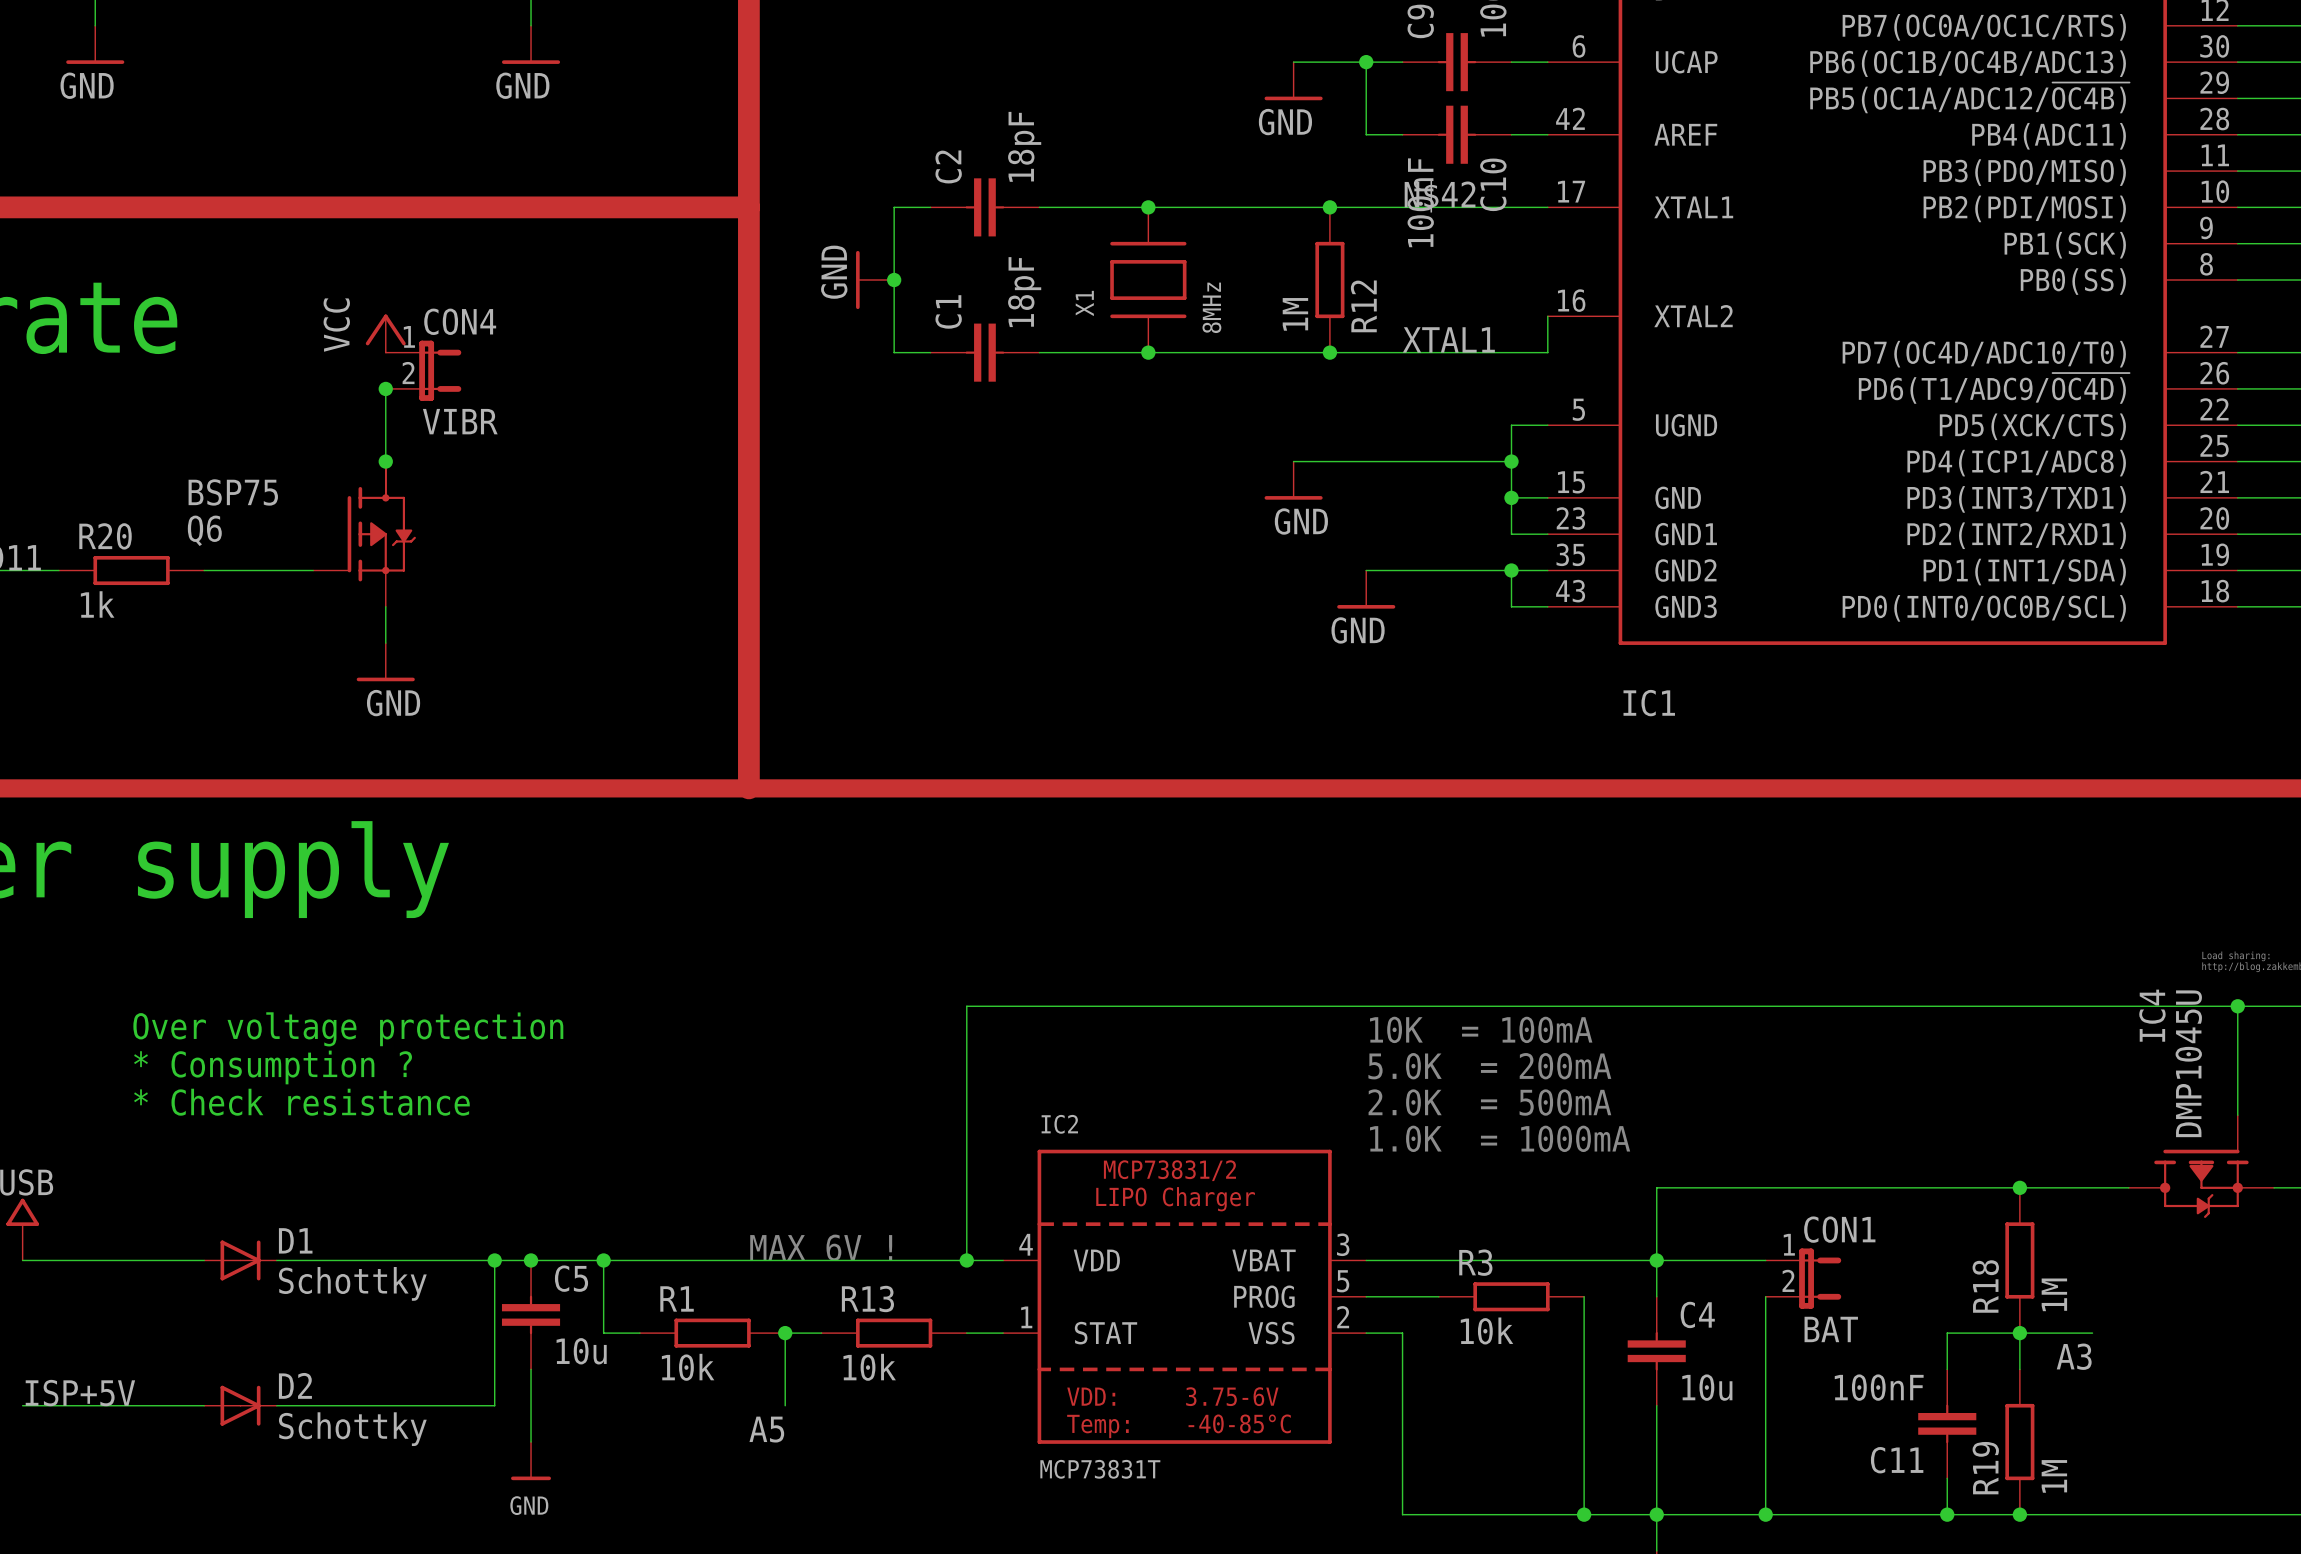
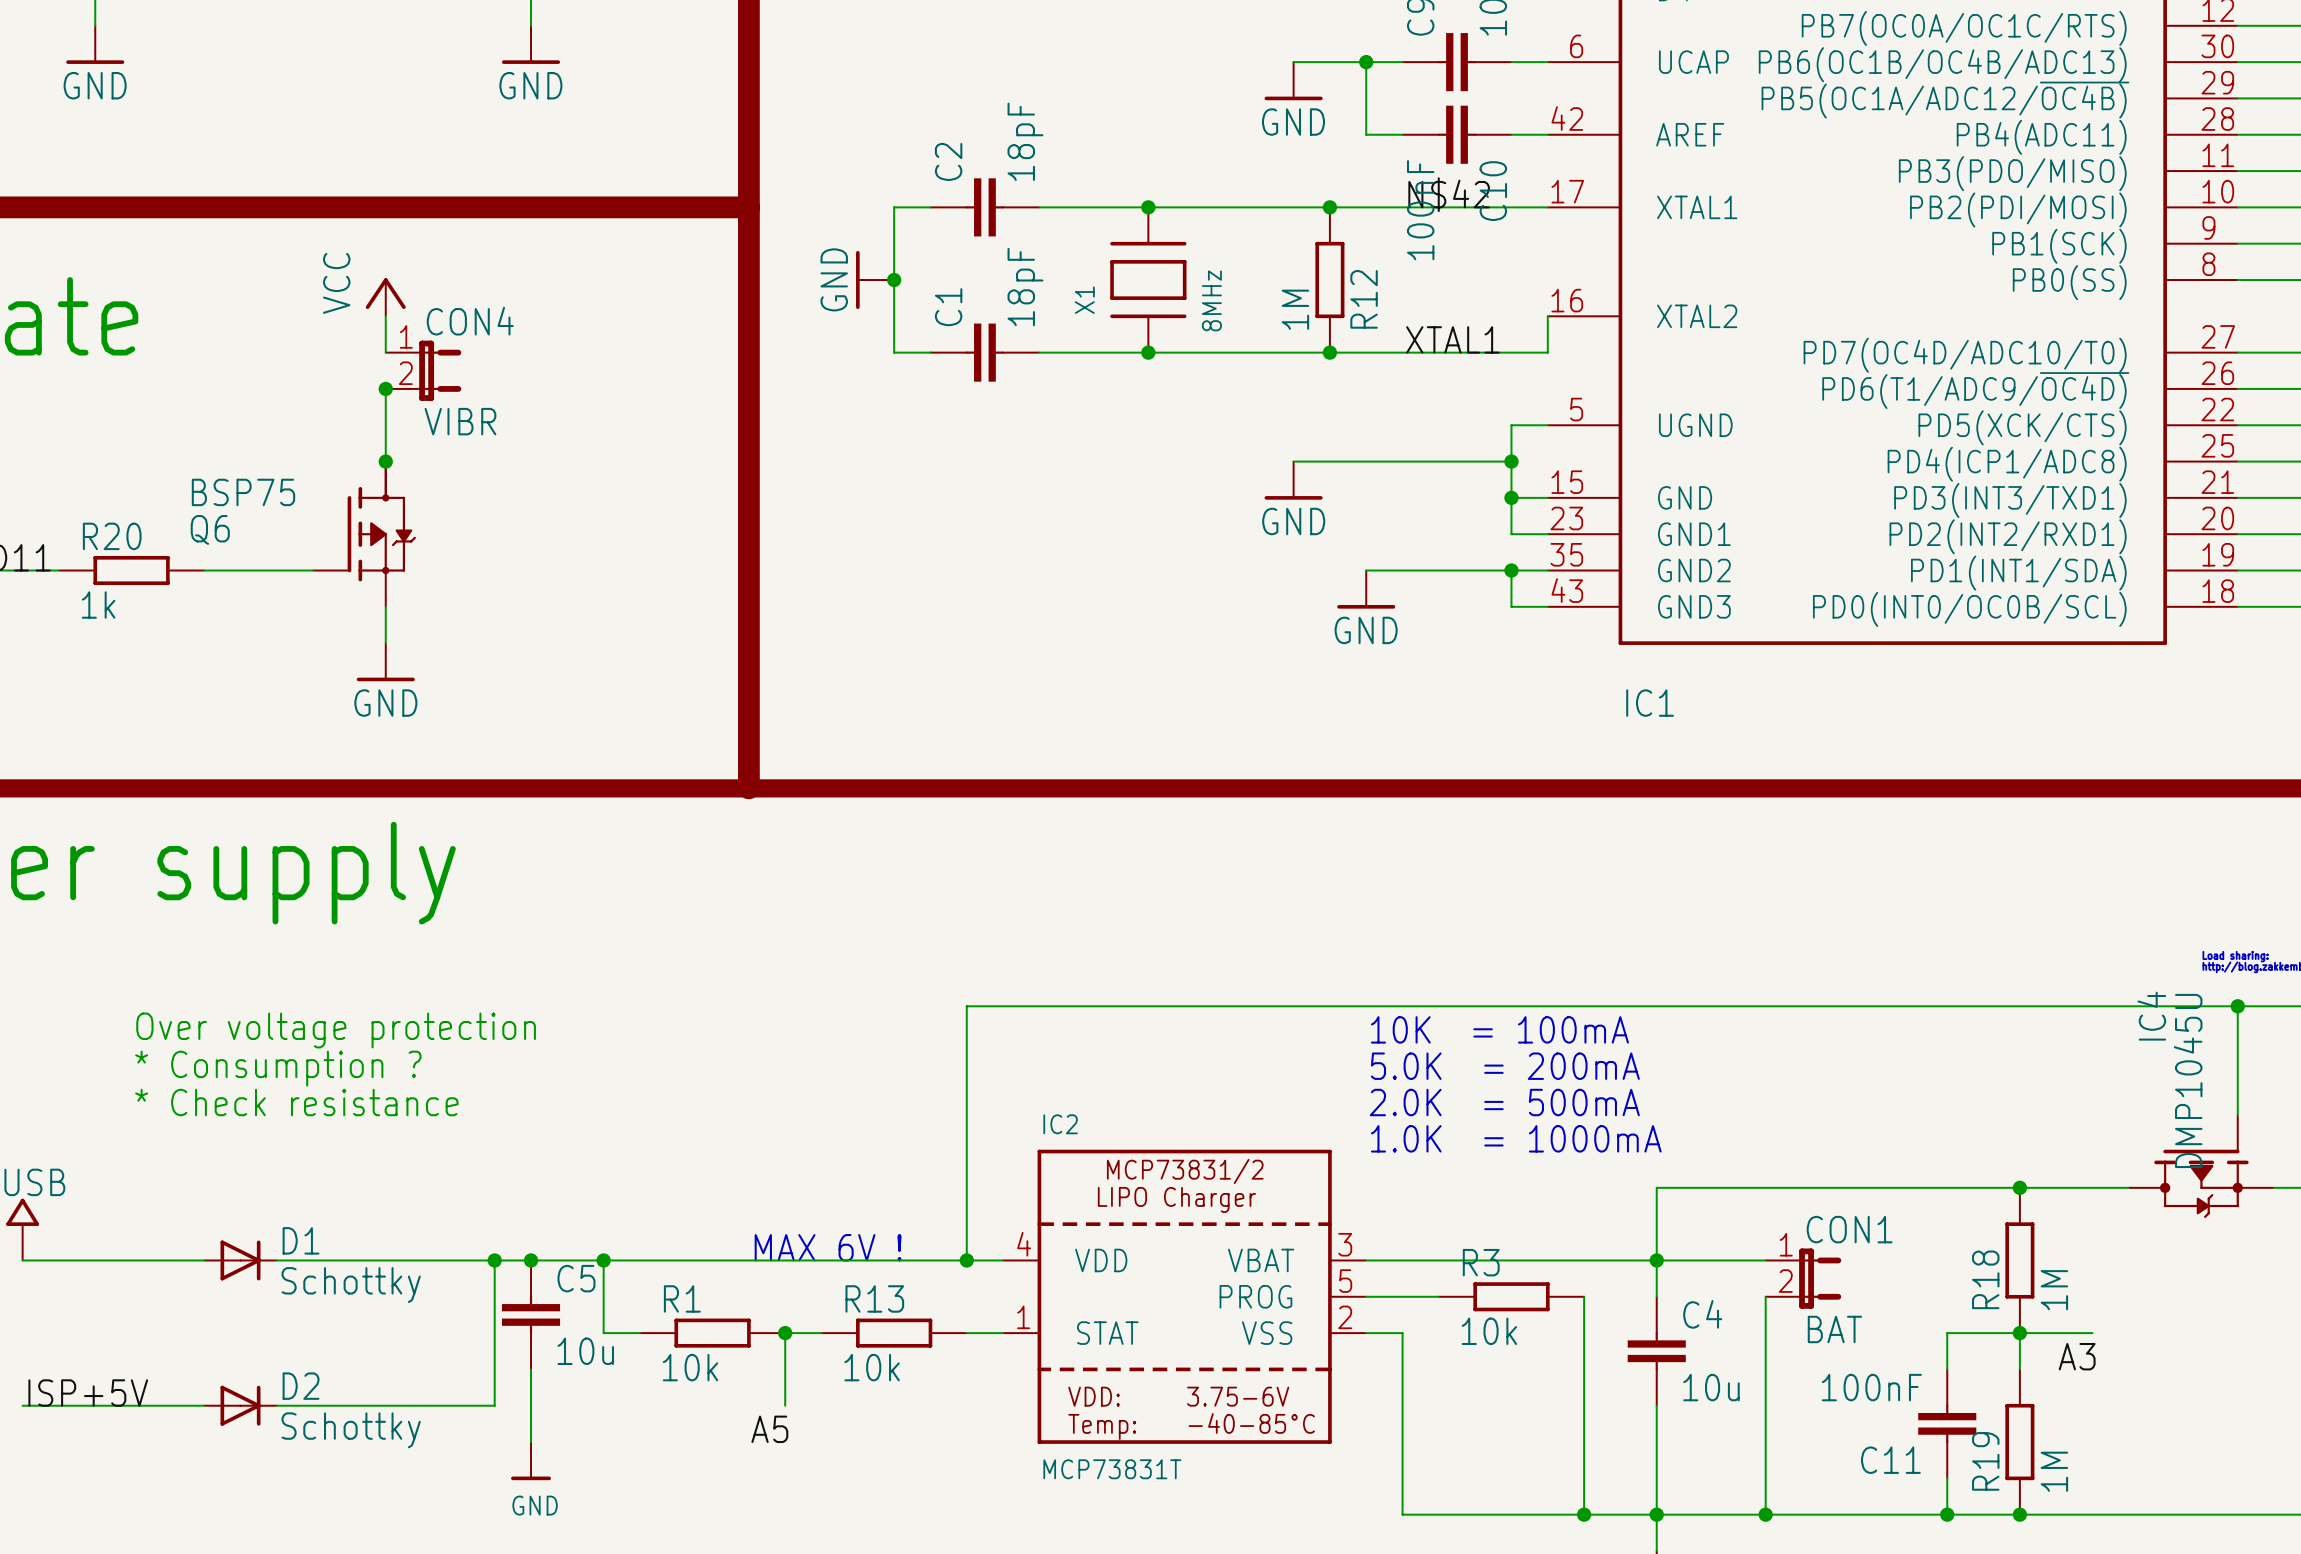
power symbol position: VCC (385, 333) -> VCC (385, 297)

